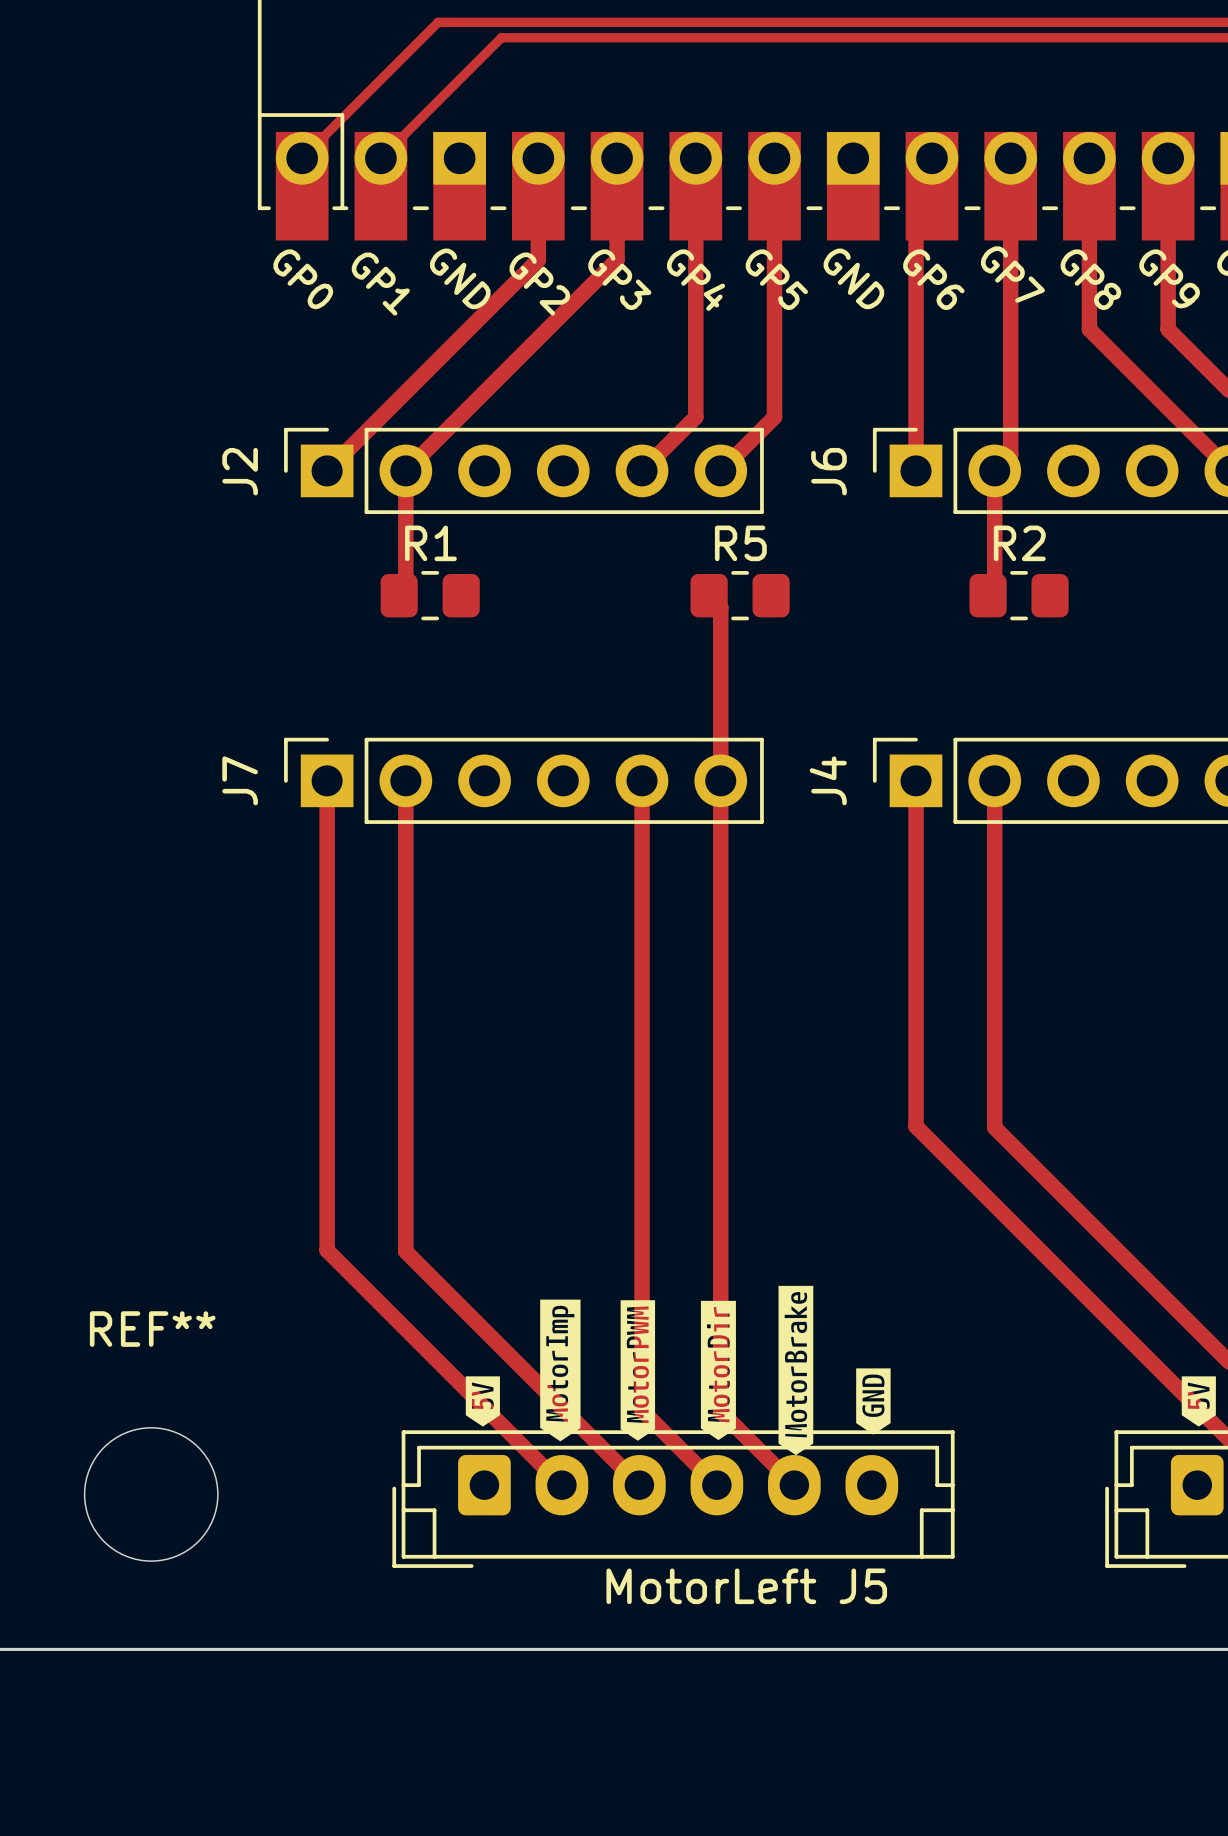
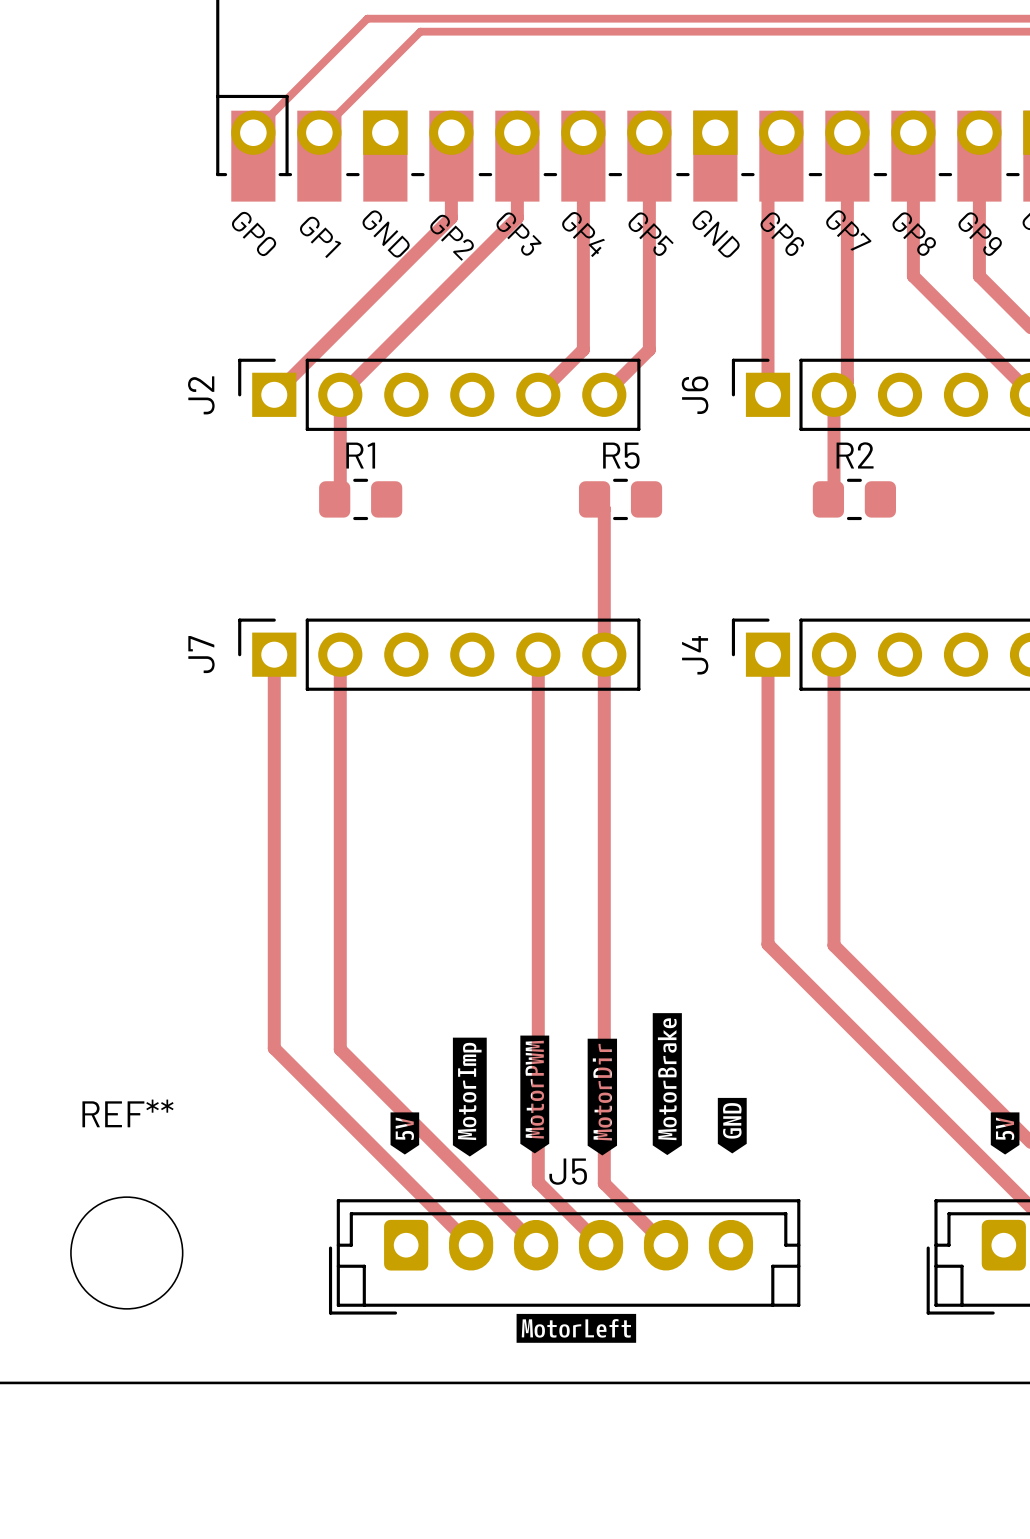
drawing position: (560, 1370) -> (469, 1097)
drawing position: (637, 1370) -> (534, 1094)
drawing position: (718, 1370) -> (602, 1097)
drawing position: (795, 1370) -> (667, 1084)
drawing position: (482, 1401) -> (404, 1133)
drawing position: (873, 1401) -> (732, 1125)
drawing position: (1198, 1401) -> (1005, 1133)
drawing: none -> [516, 1313, 637, 1343]
text: MotorLeft (711, 1586) -> none
J5 name position: J5 (863, 1586) -> J5 (568, 1171)

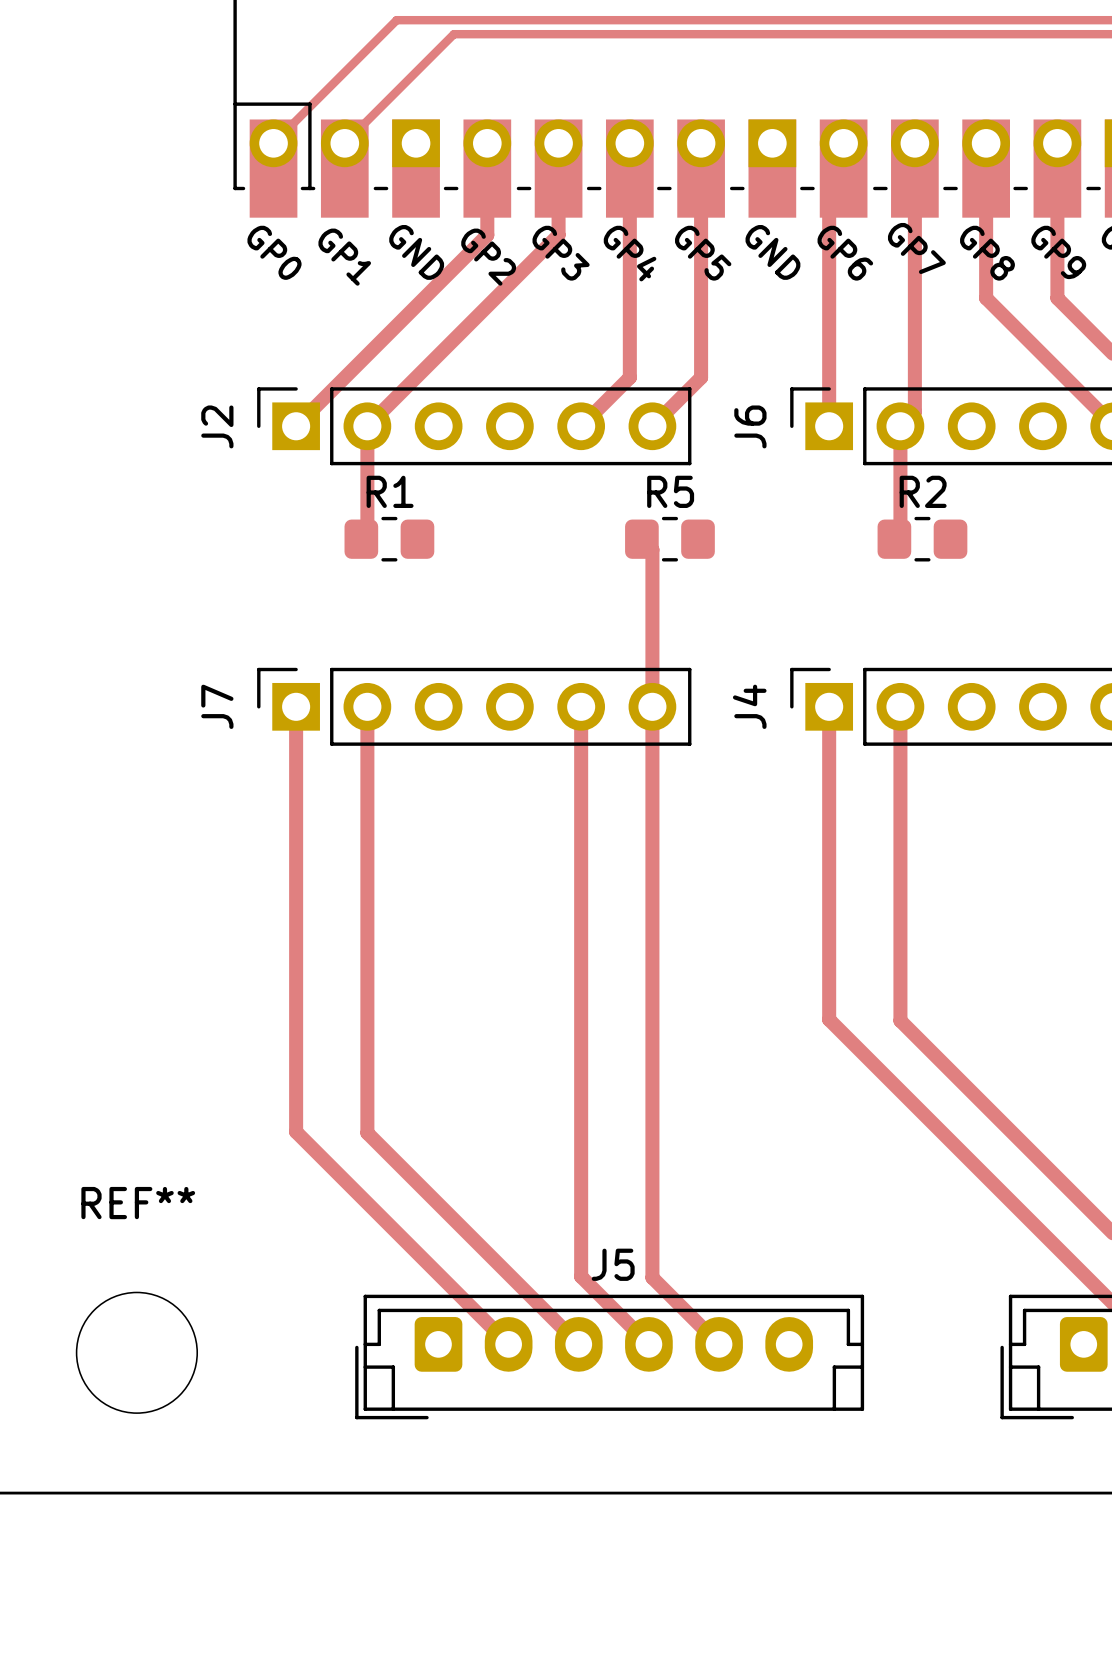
drawing: [652, 1013, 682, 1156] -> none
drawing: [520, 1035, 550, 1154] -> none
drawing: [452, 1037, 487, 1157] -> none
drawing: [587, 1038, 618, 1156] -> none
drawing: [717, 1097, 747, 1154] -> none
drawing: [390, 1112, 420, 1155] -> none
drawing: [990, 1112, 1020, 1155] -> none
drawing: [516, 1313, 637, 1343] -> none

